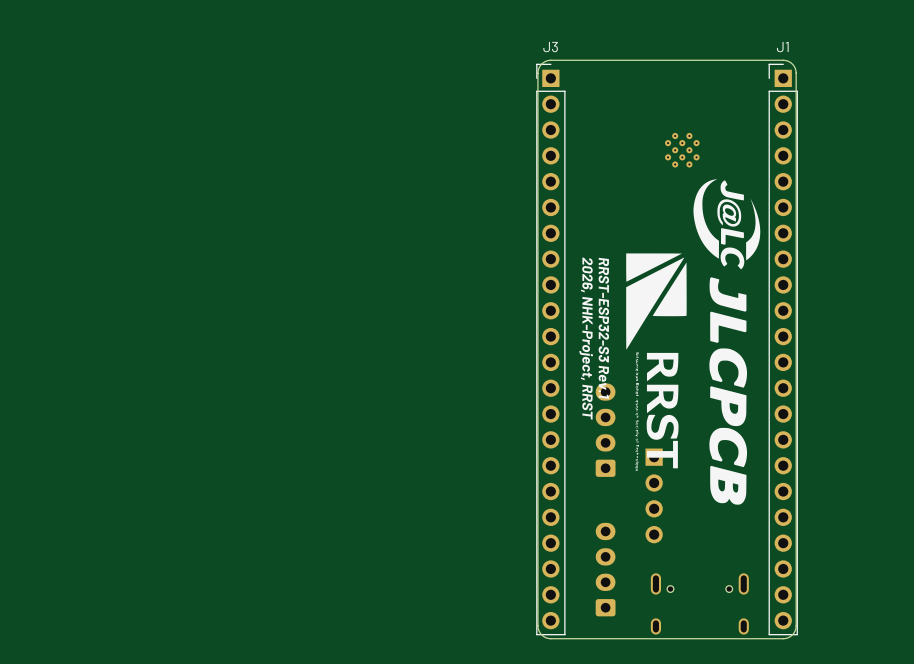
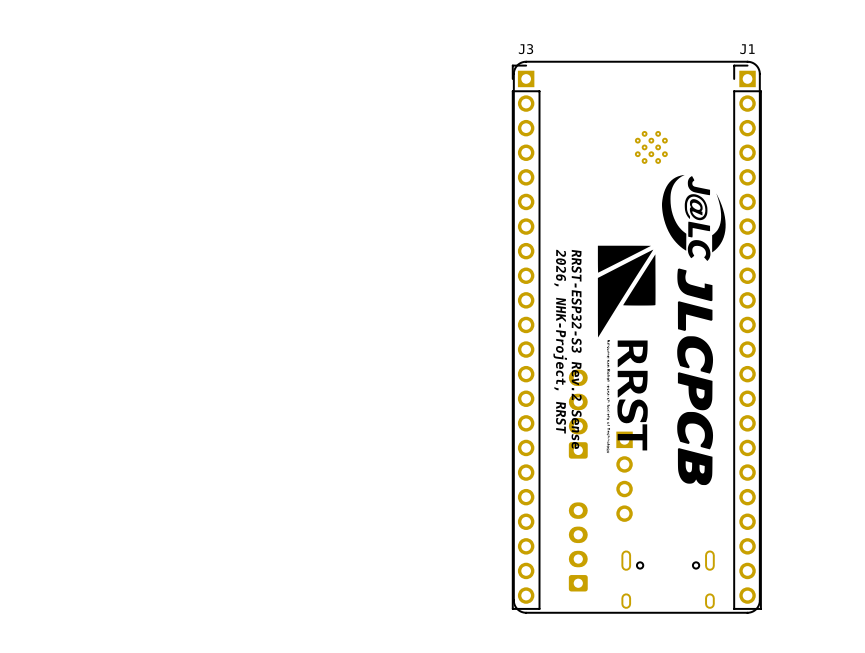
text: RRST-ESP32-S3 Rev.1 (603, 328) -> RRST-ESP32-S3 Rev.2 Sense (576, 349)

